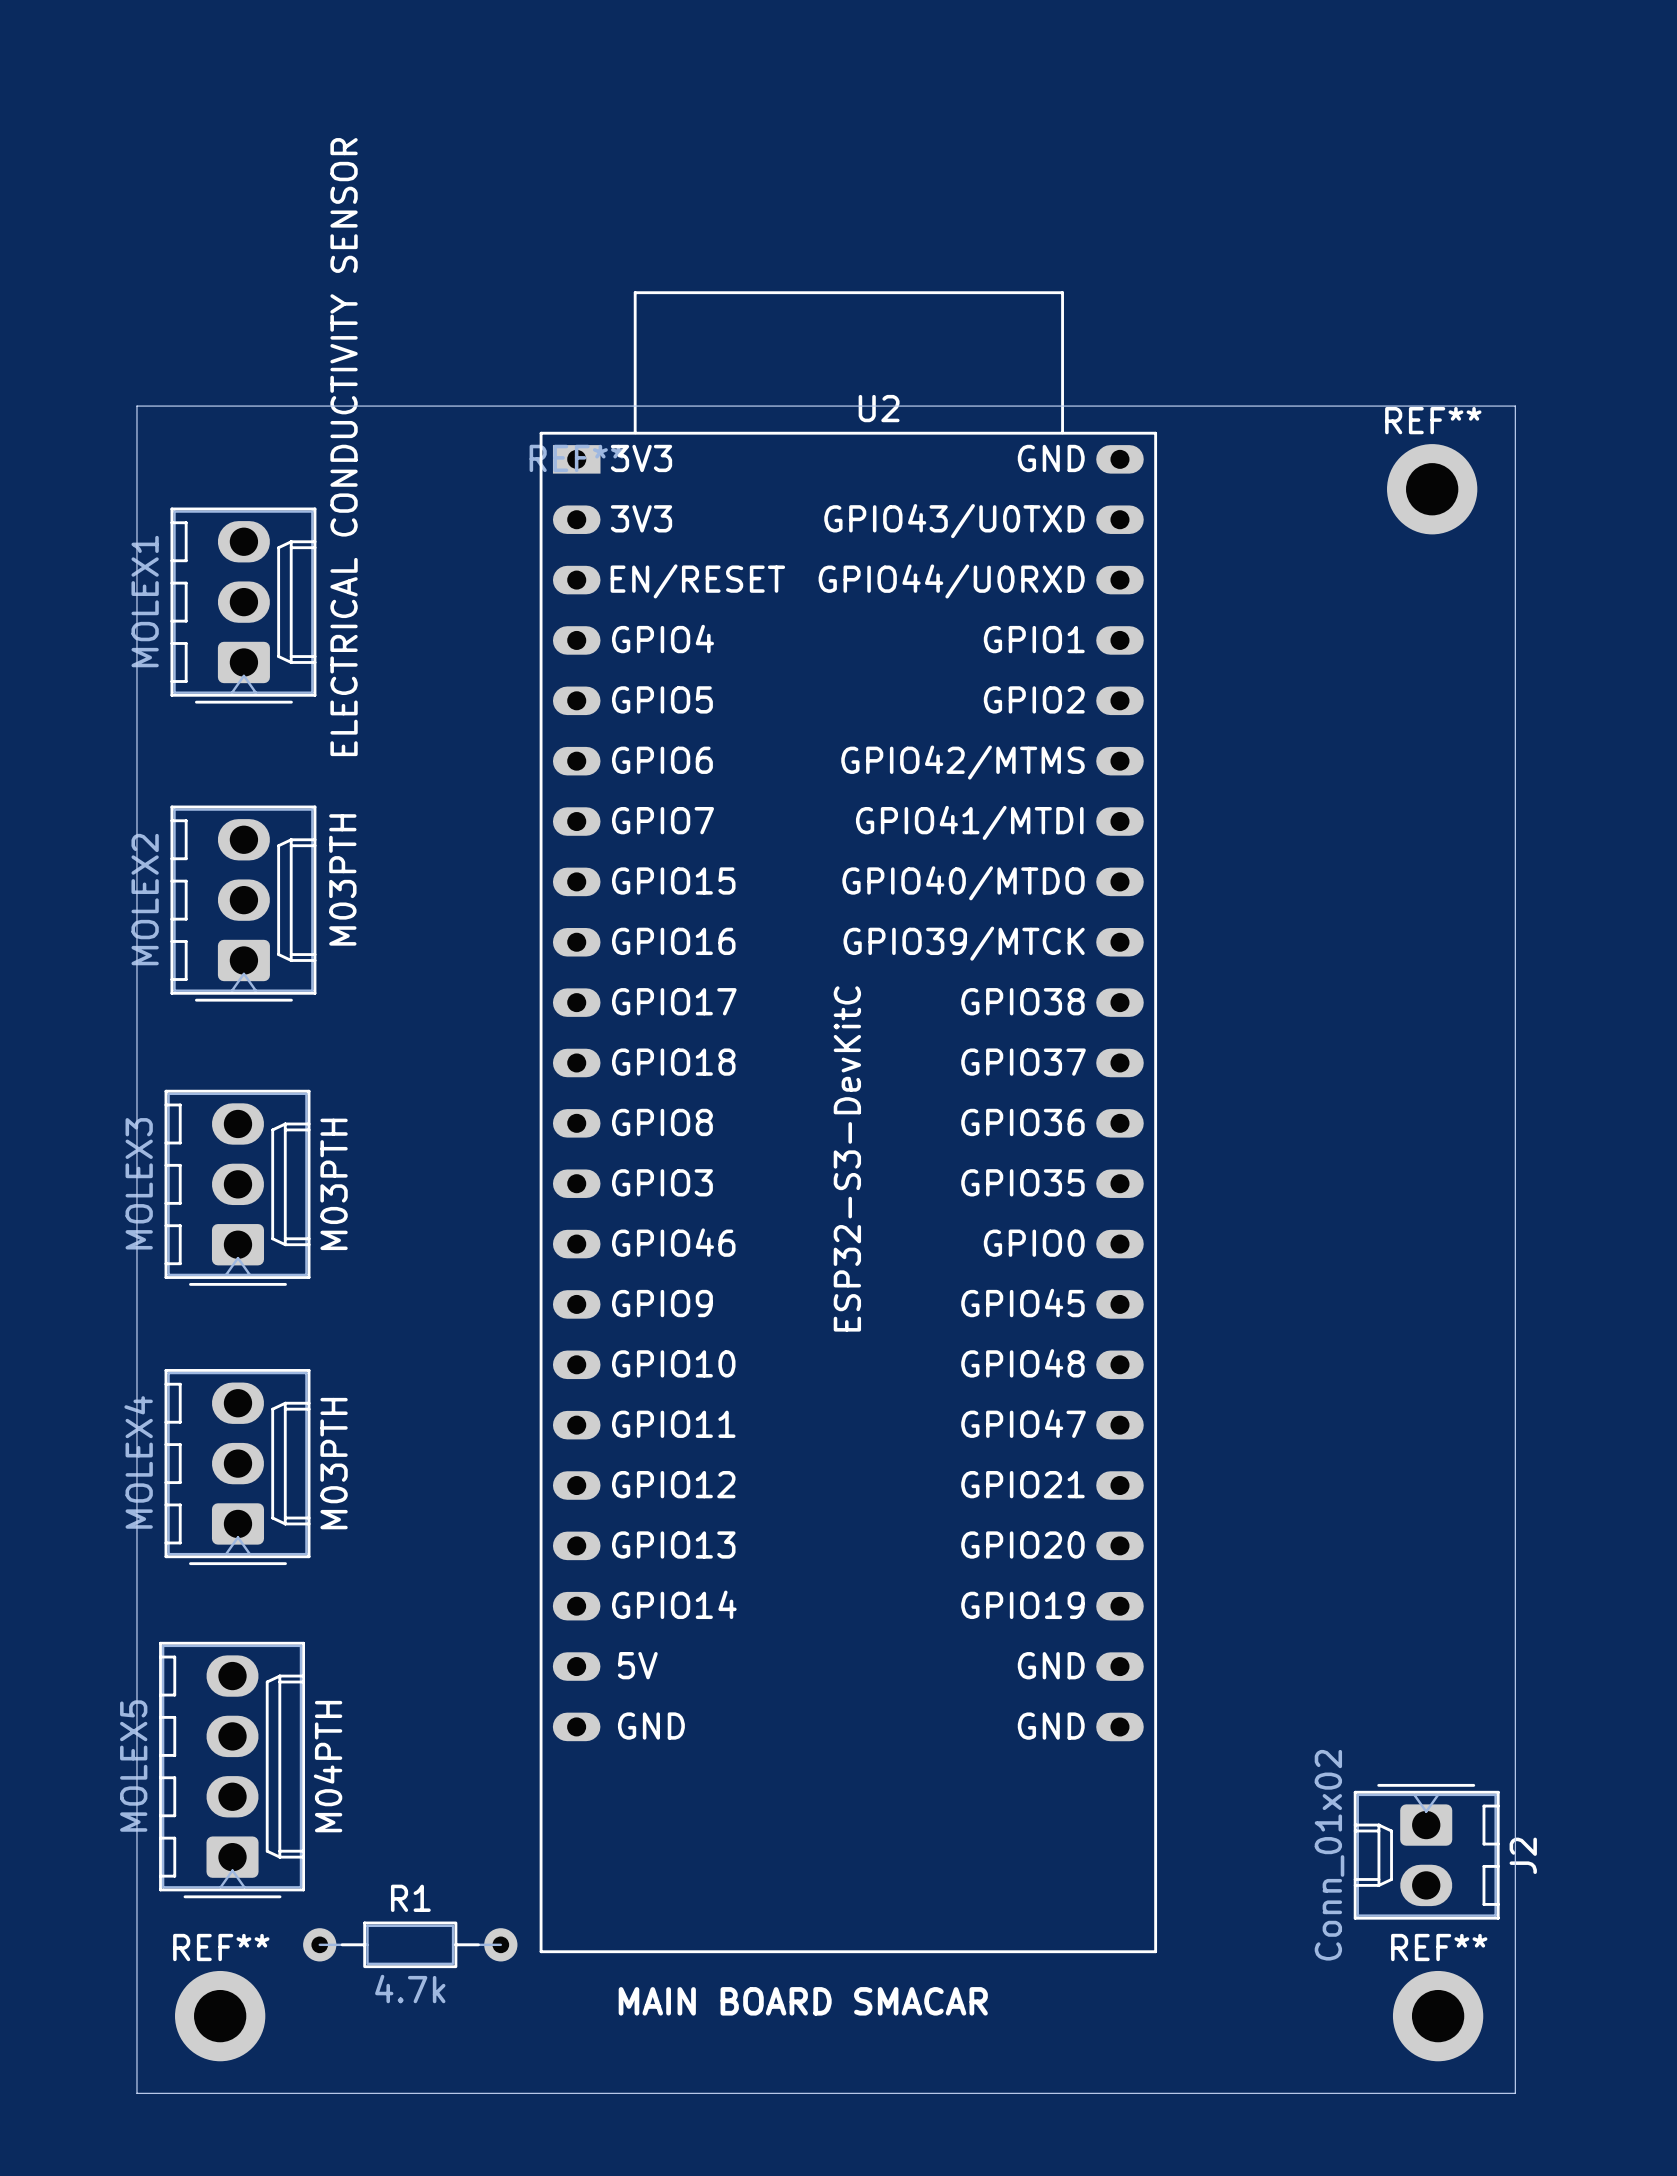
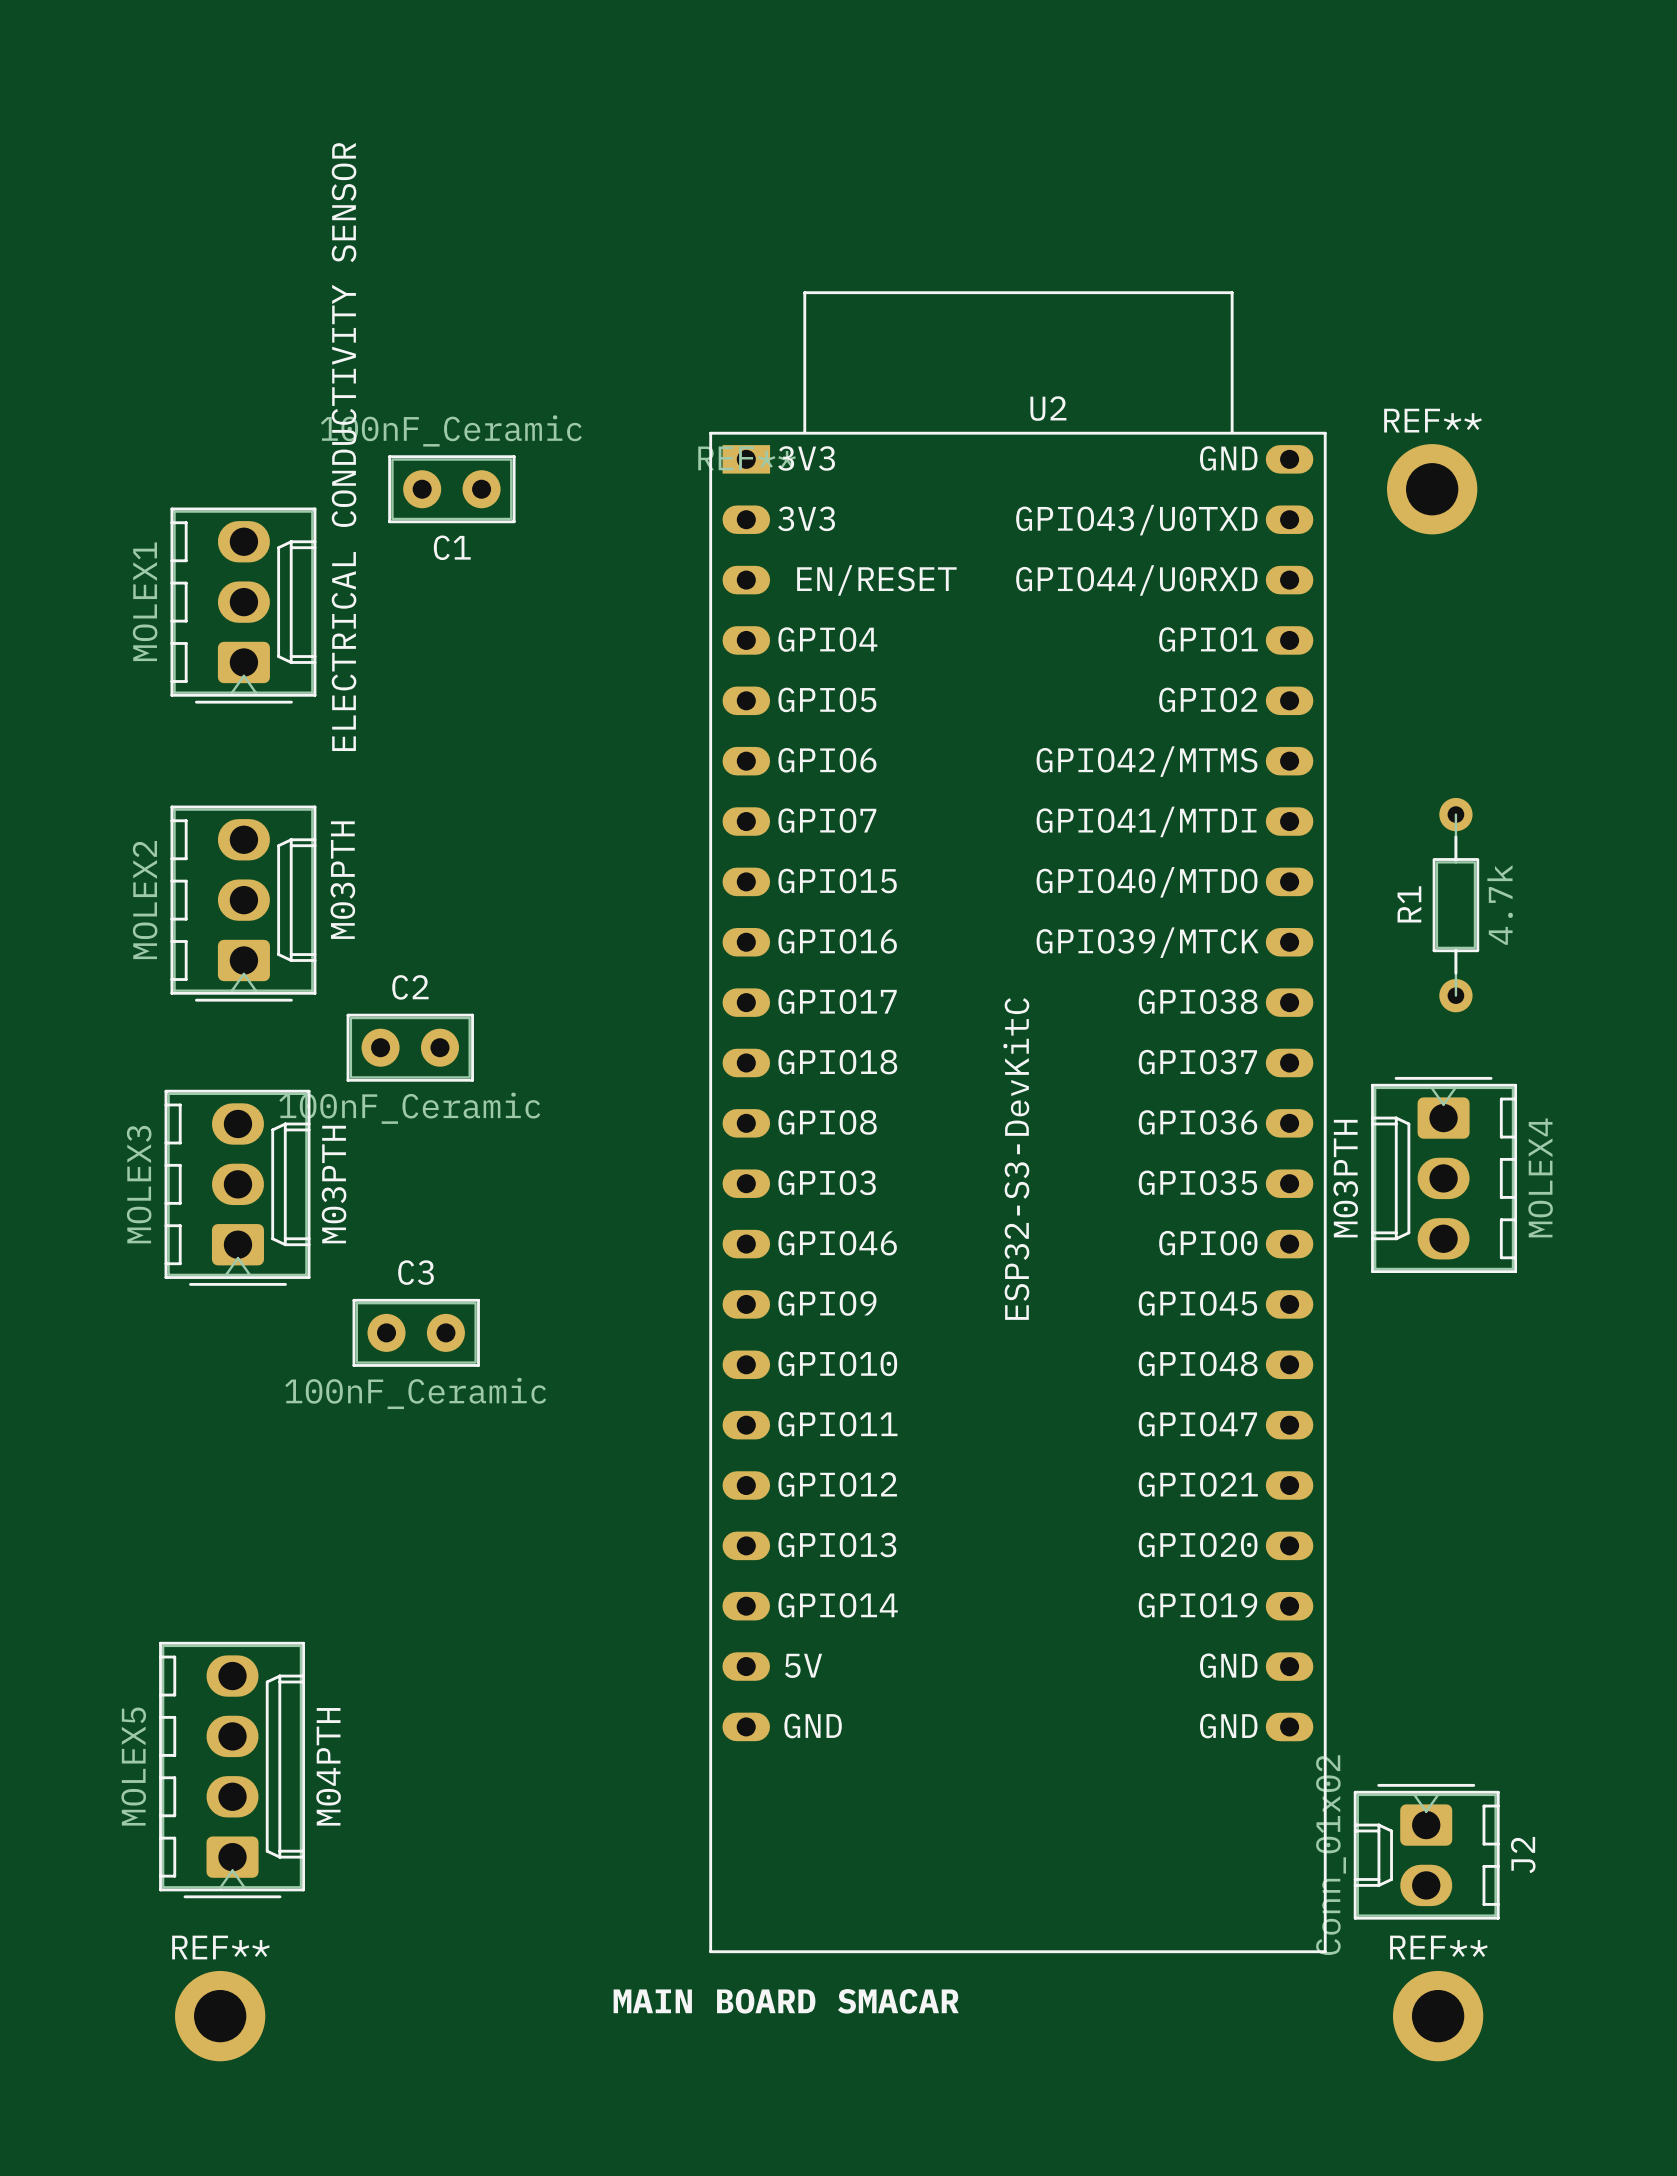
board edge: (136, 406) (1515, 406) (1515, 2093) (136, 2093) (136, 406) -> none
C1: none -> 100nF_Ceramic (451, 489)
C2: none -> 100nF_Ceramic (410, 1047)
U2 position: (848, 1122) -> (1017, 1122)
C3: none -> 100nF_Ceramic (416, 1332)
MOLEX4 rotation: 0° (237, 1467) -> 180° (1444, 1174)
MOLEX4 position: (237, 1467) -> (1444, 1174)
R1 name position: R1 (410, 1898) -> R1 (1409, 904)
R1 rotation: 0° (410, 1944) -> 90° clockwise (1455, 905)
R1 position: (410, 1944) -> (1455, 905)
R1 value position: 4.7k (410, 1989) -> 4.7k (1500, 904)

